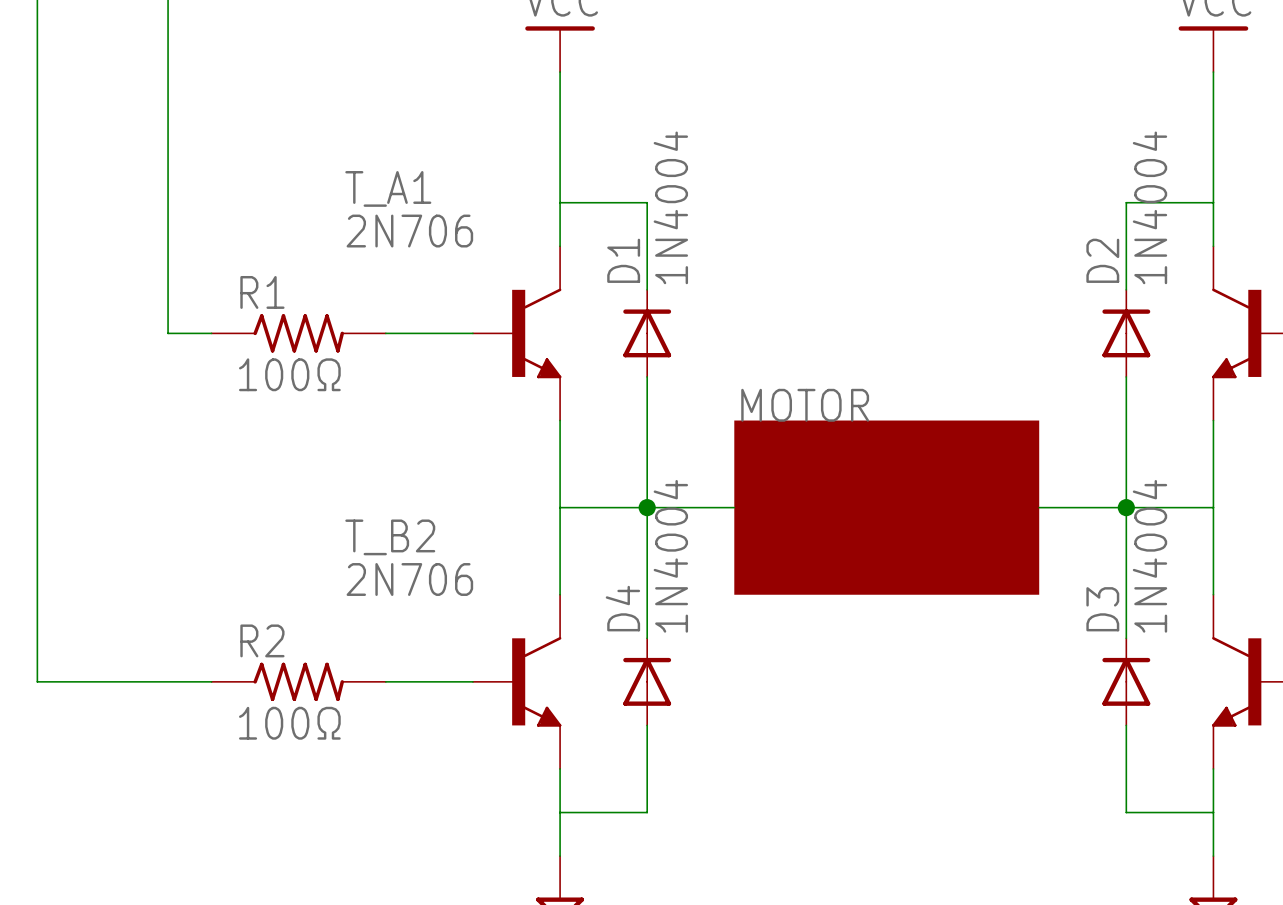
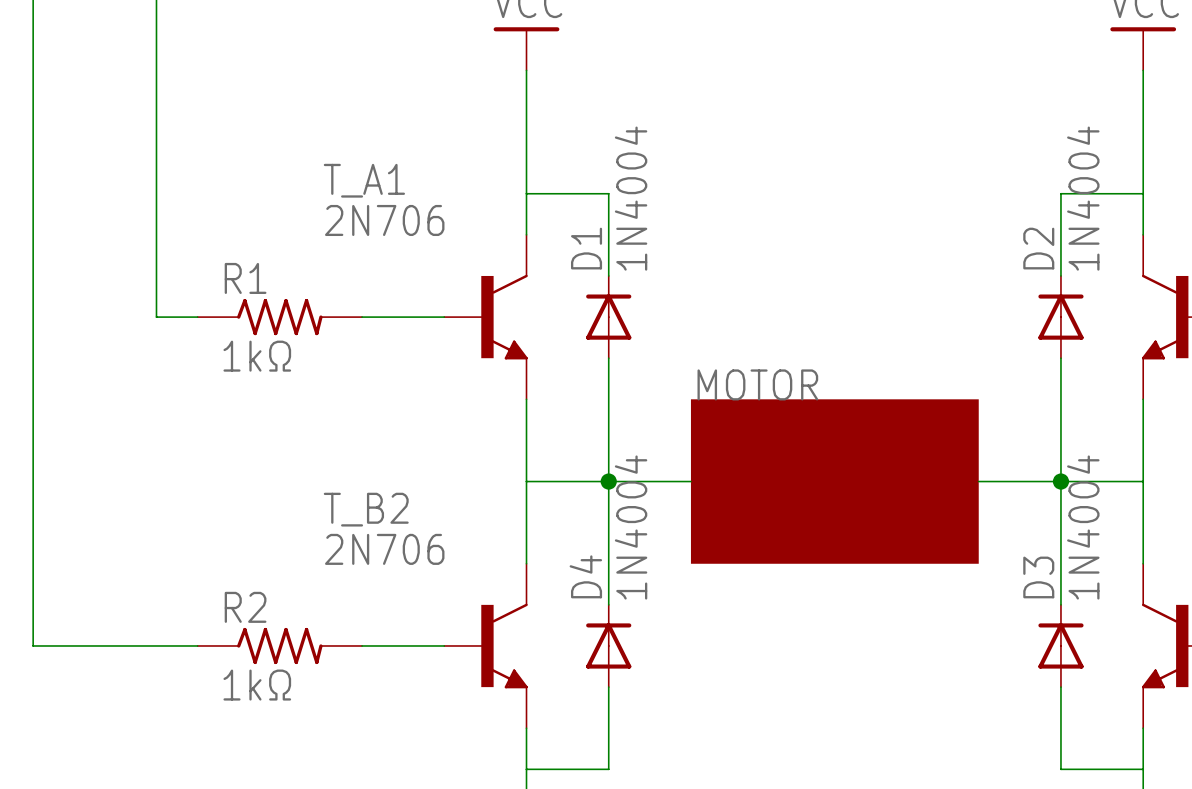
R1 value: 100Ω (289, 374) -> 1kΩ (257, 356)
R2 value: 100Ω (289, 723) -> 1kΩ (257, 685)

